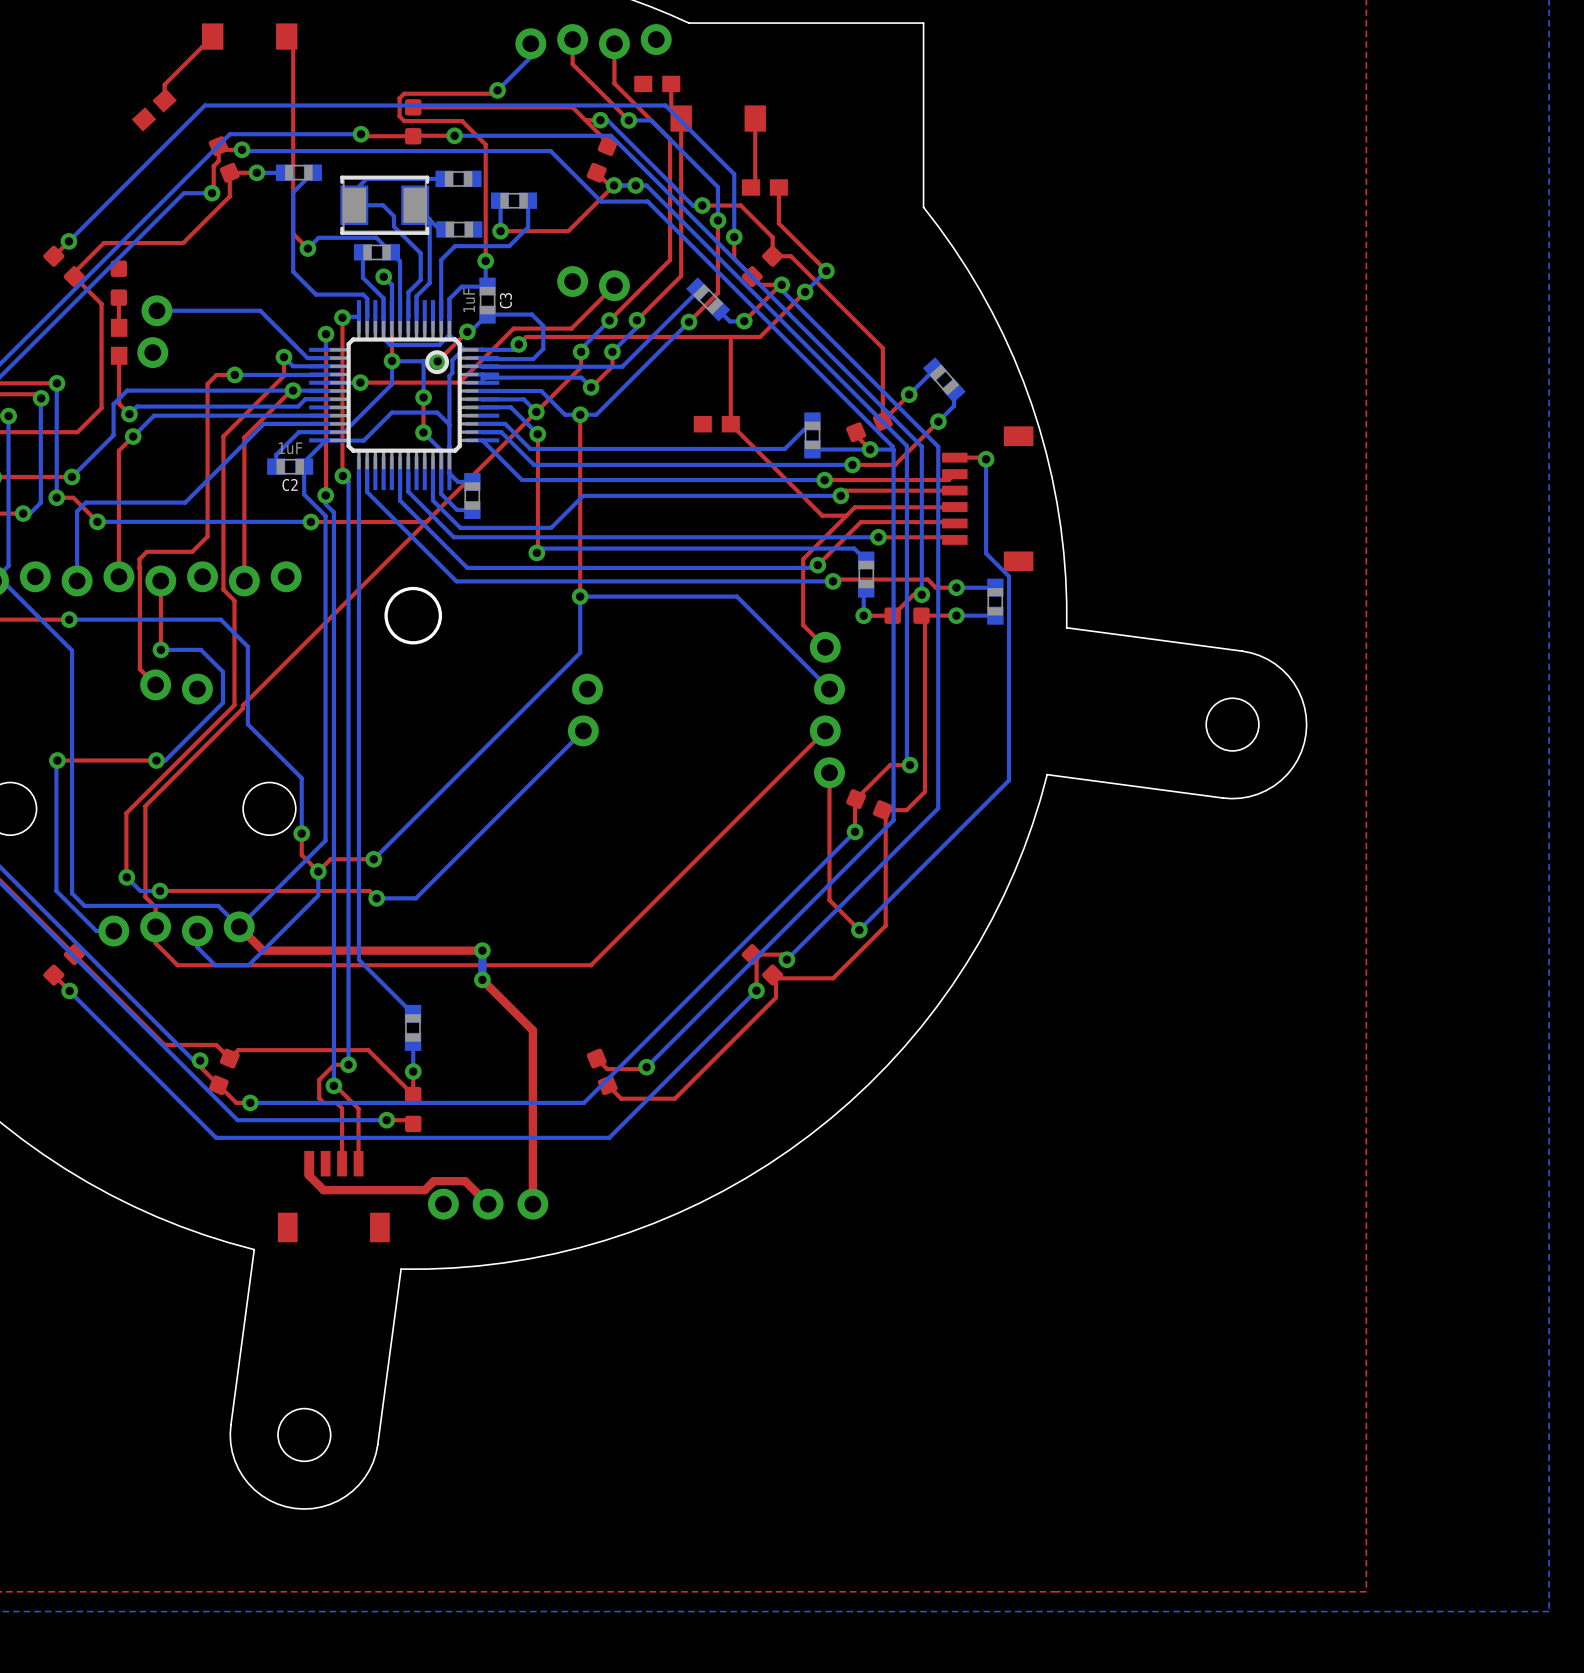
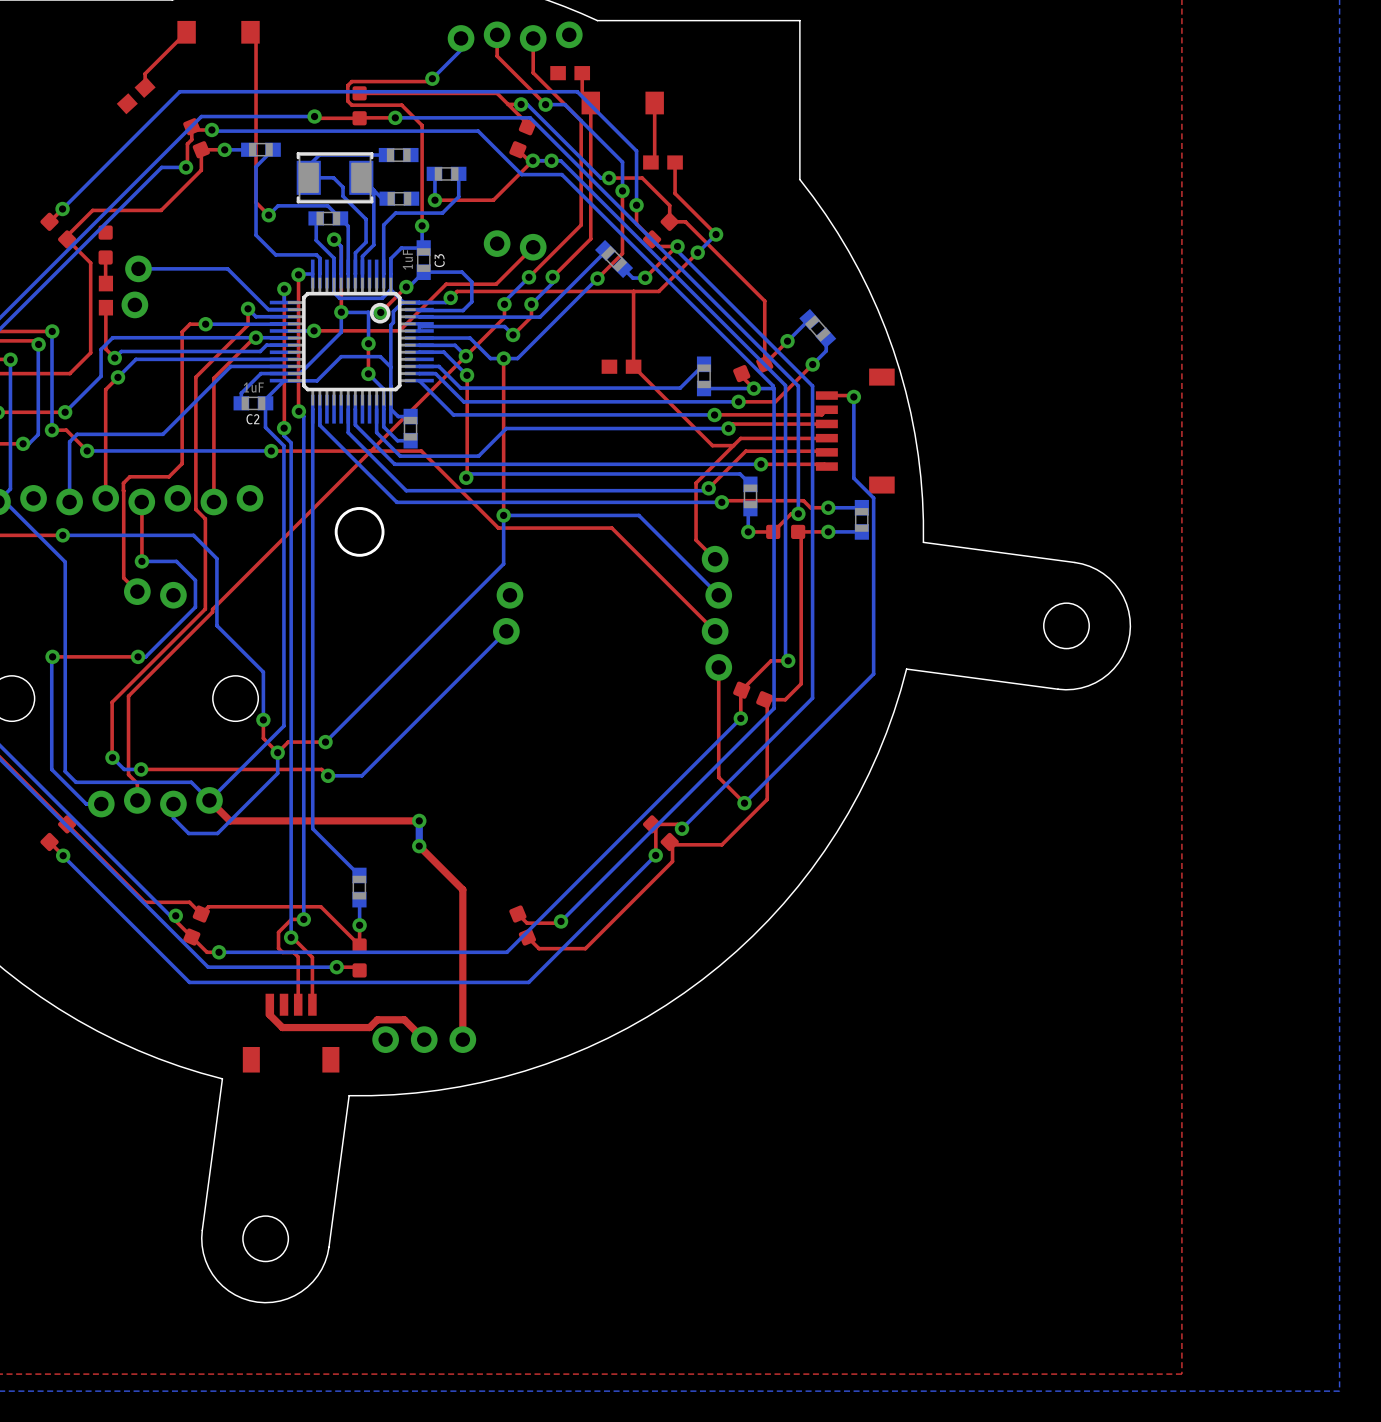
top track: (825, 730) (590, 965) (177, 965) (155, 943) (155, 926) -> (715, 631) (611, 528) (498, 528) (421, 451) (370, 451)

